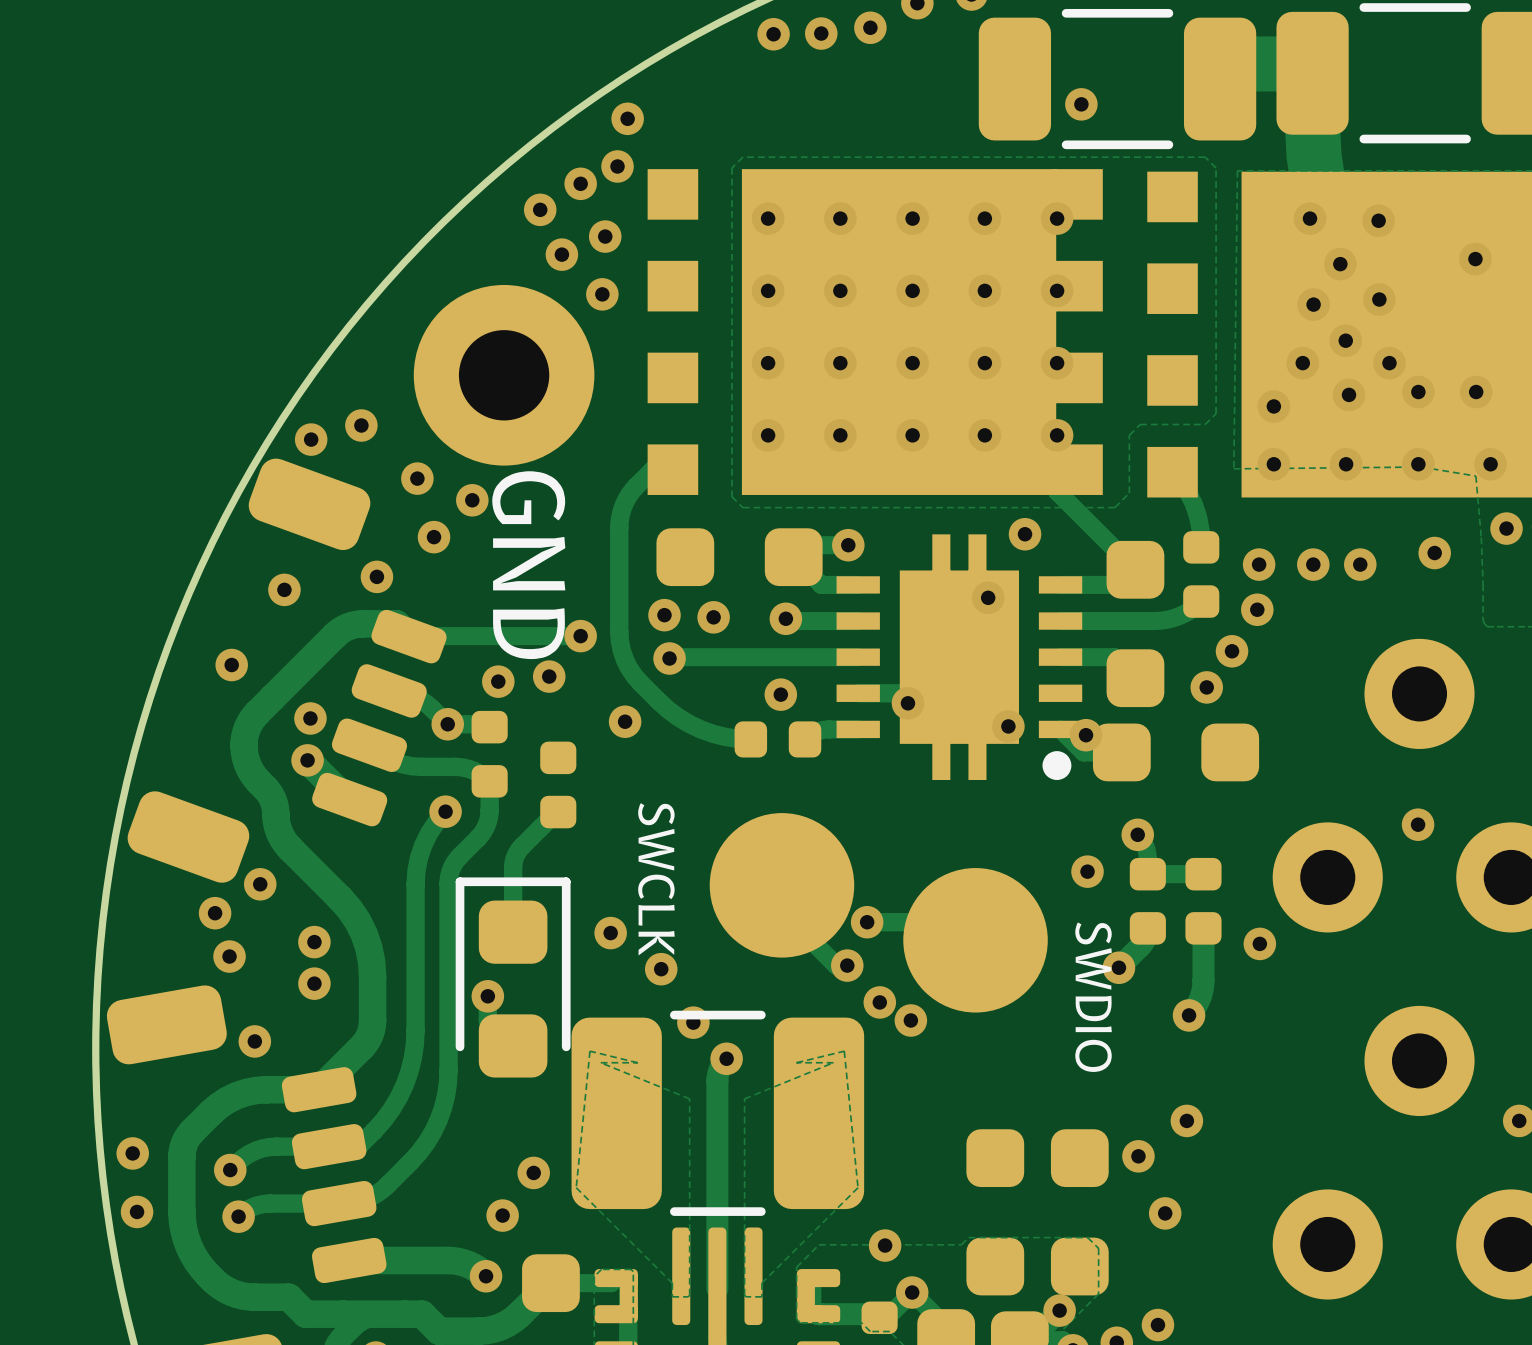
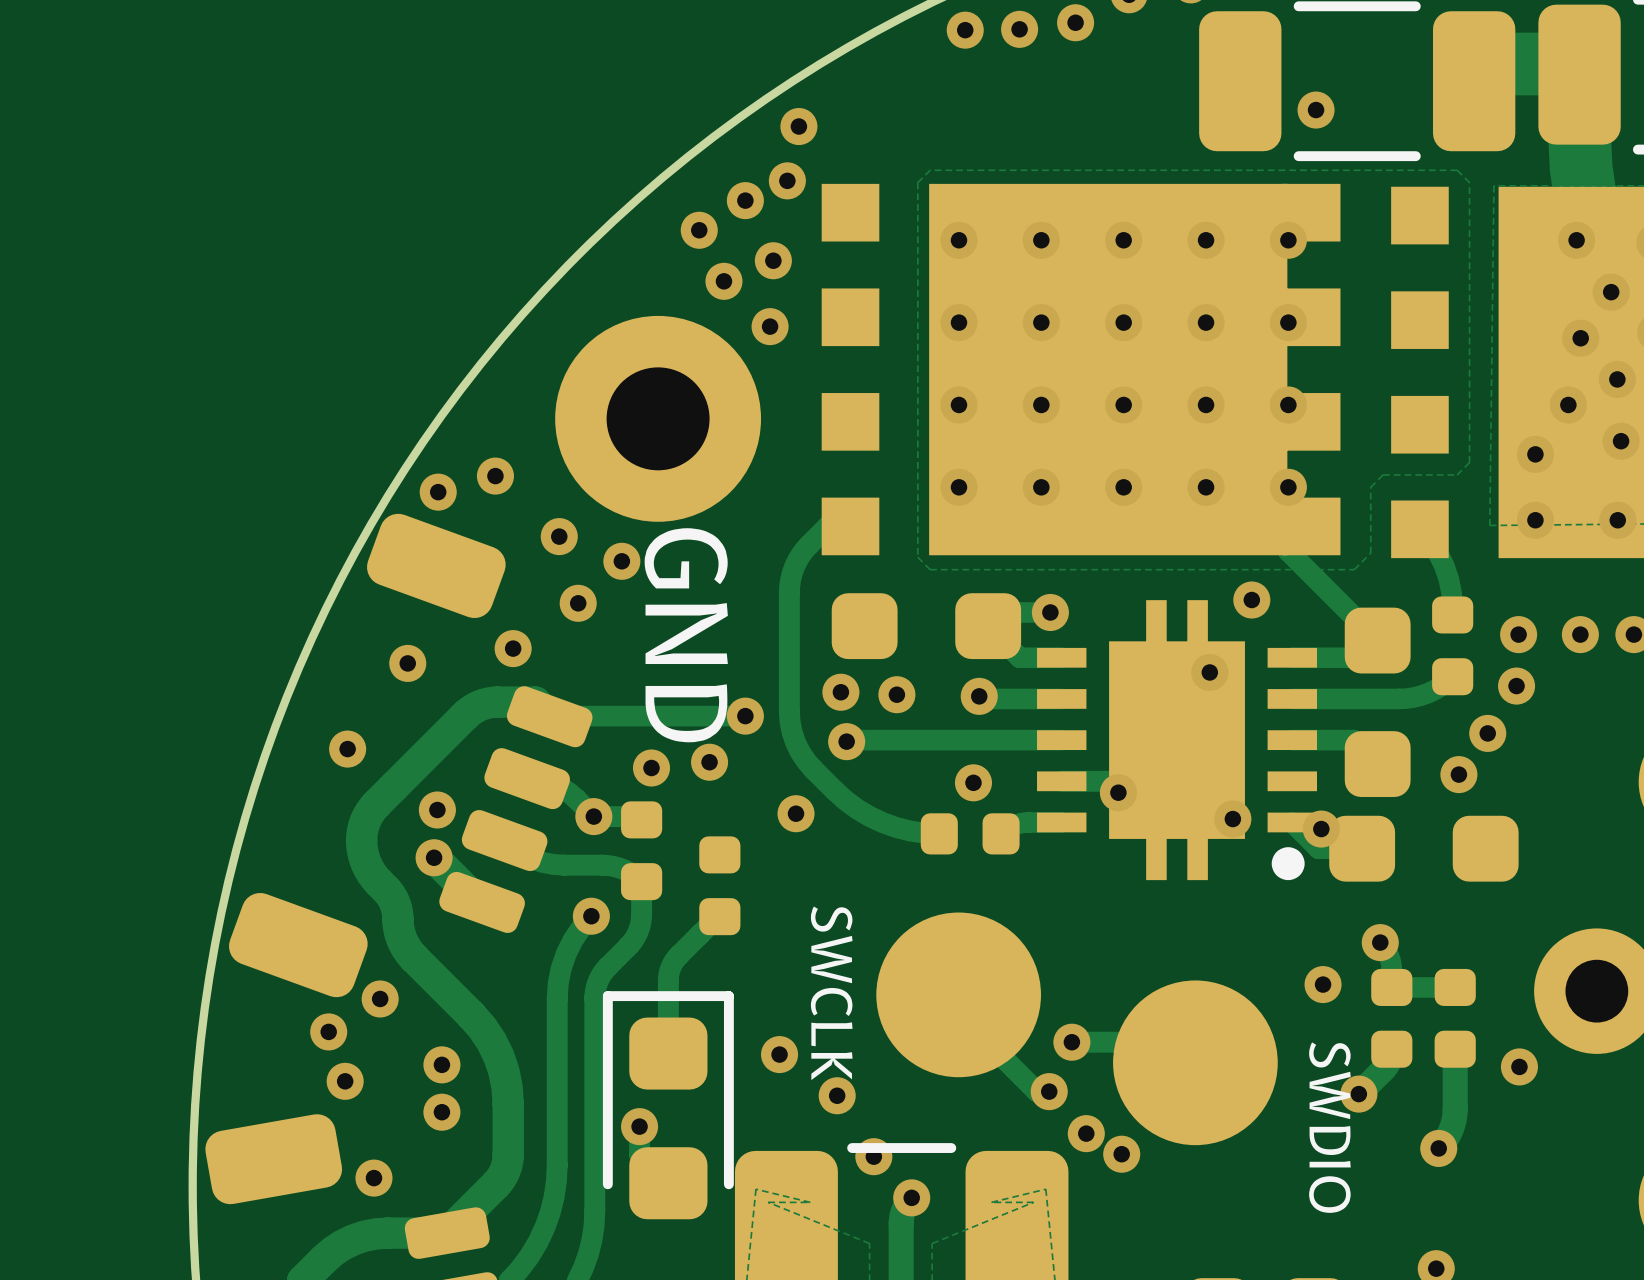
part position: (781, 885) -> (958, 994)

